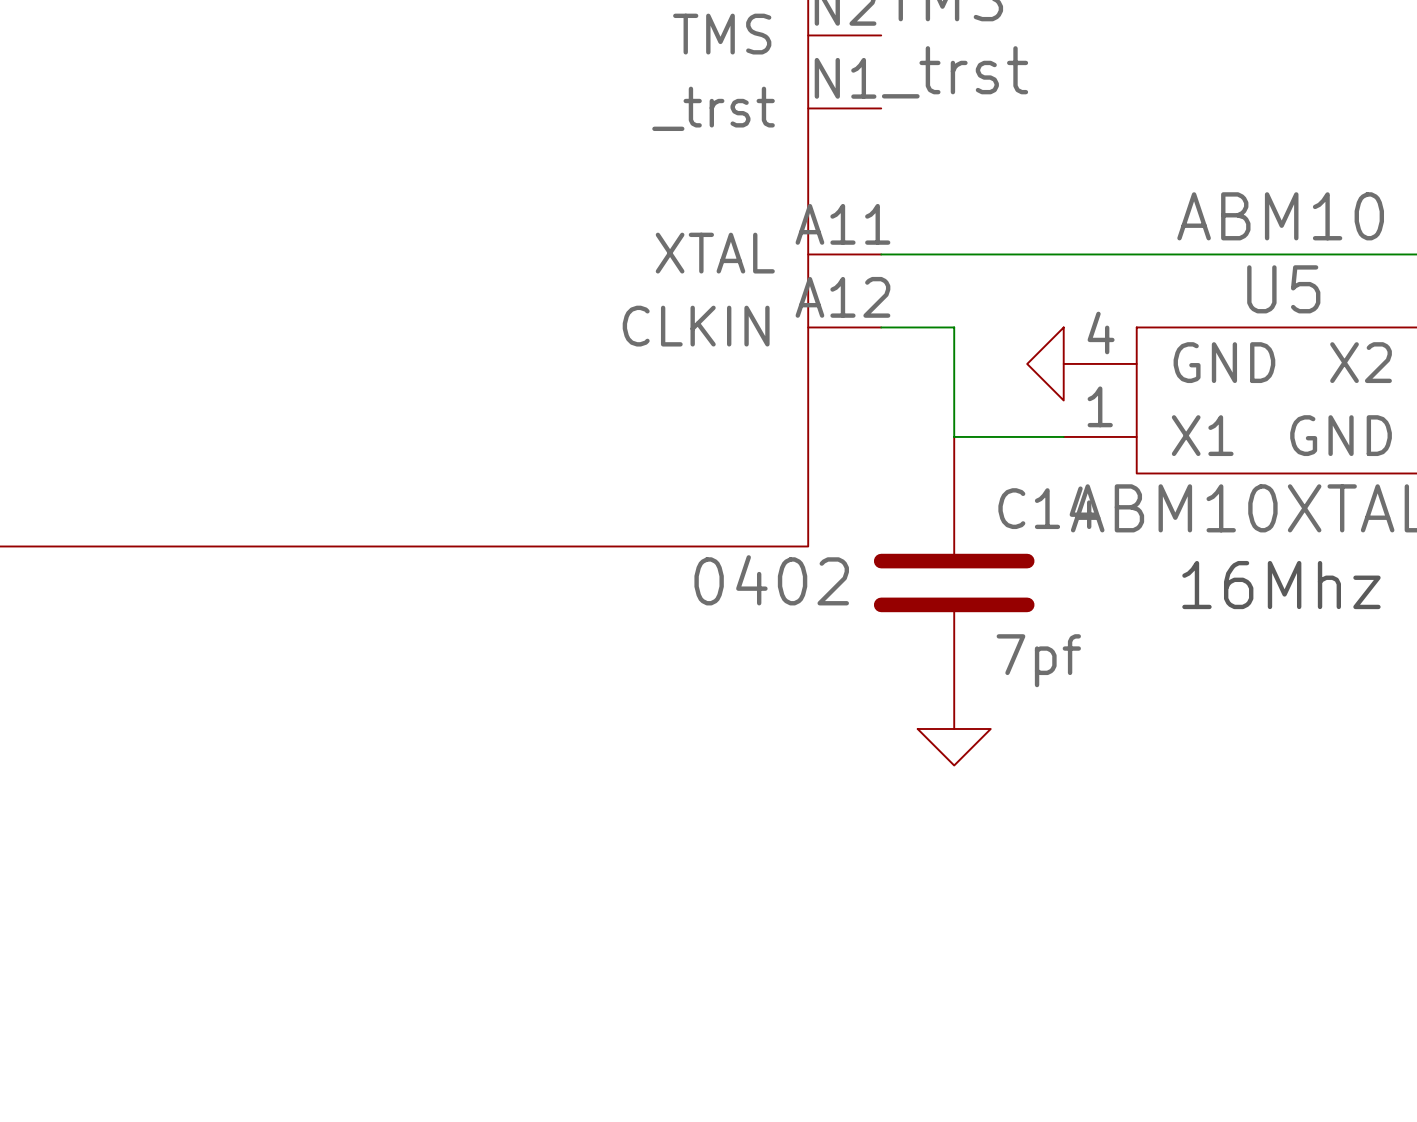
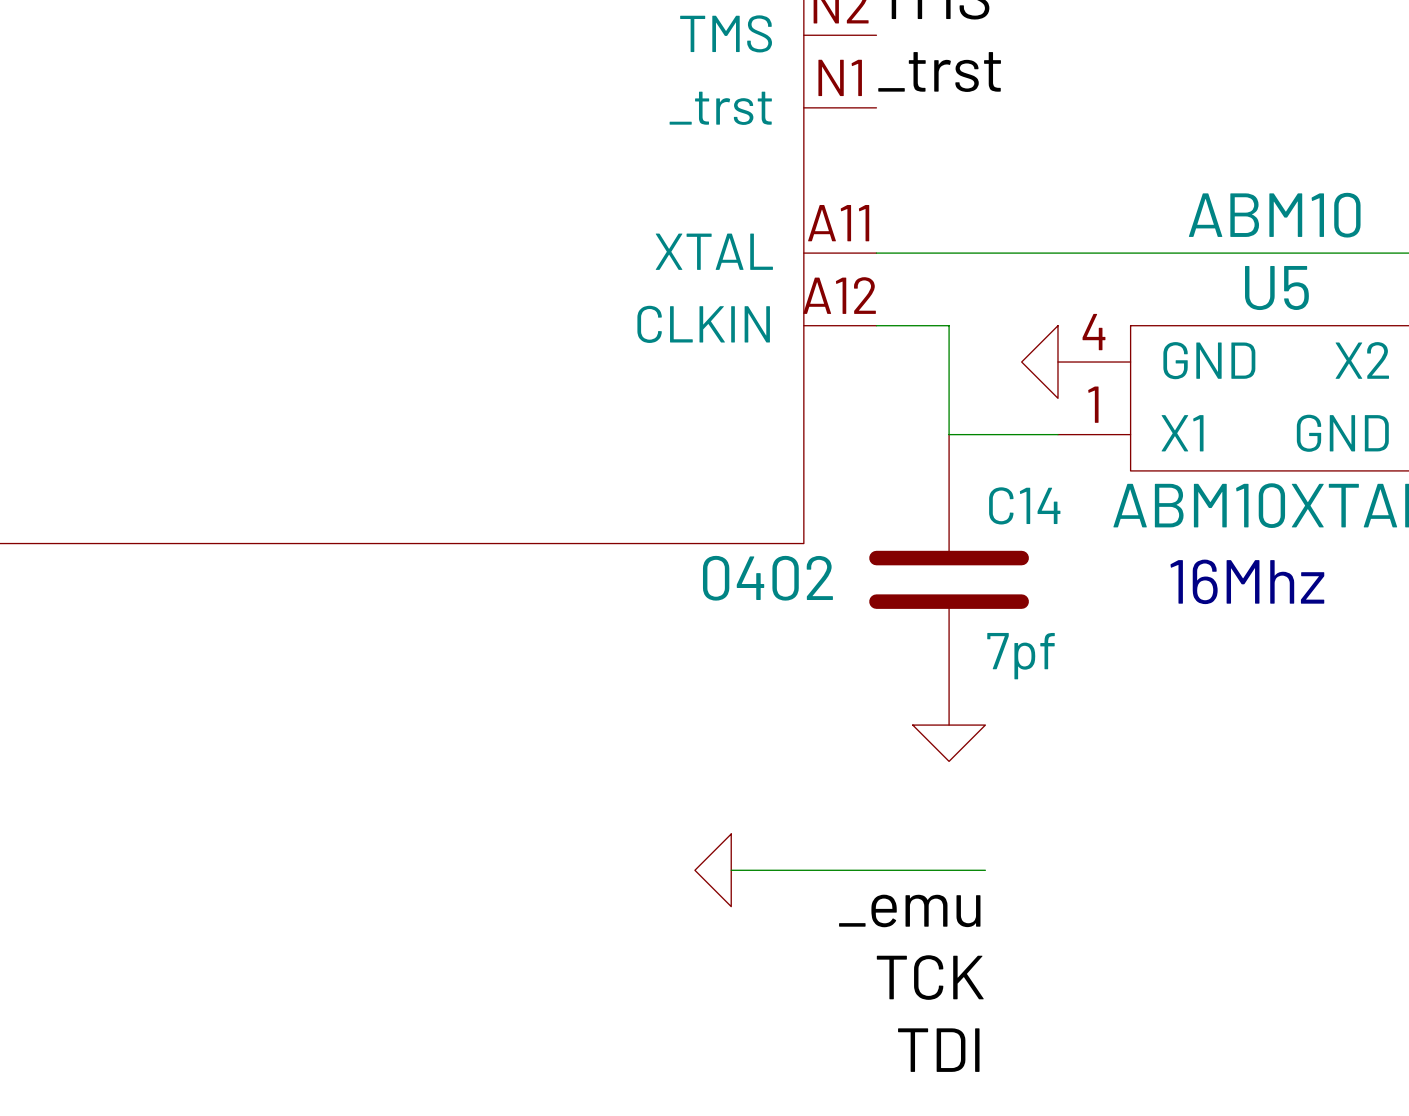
power symbol: none -> (713, 870)
wire: none -> (731, 870) (985, 870)
label: none -> _emu (909, 910)
label: none -> TCK (930, 977)
label: none -> TDI (938, 1050)

